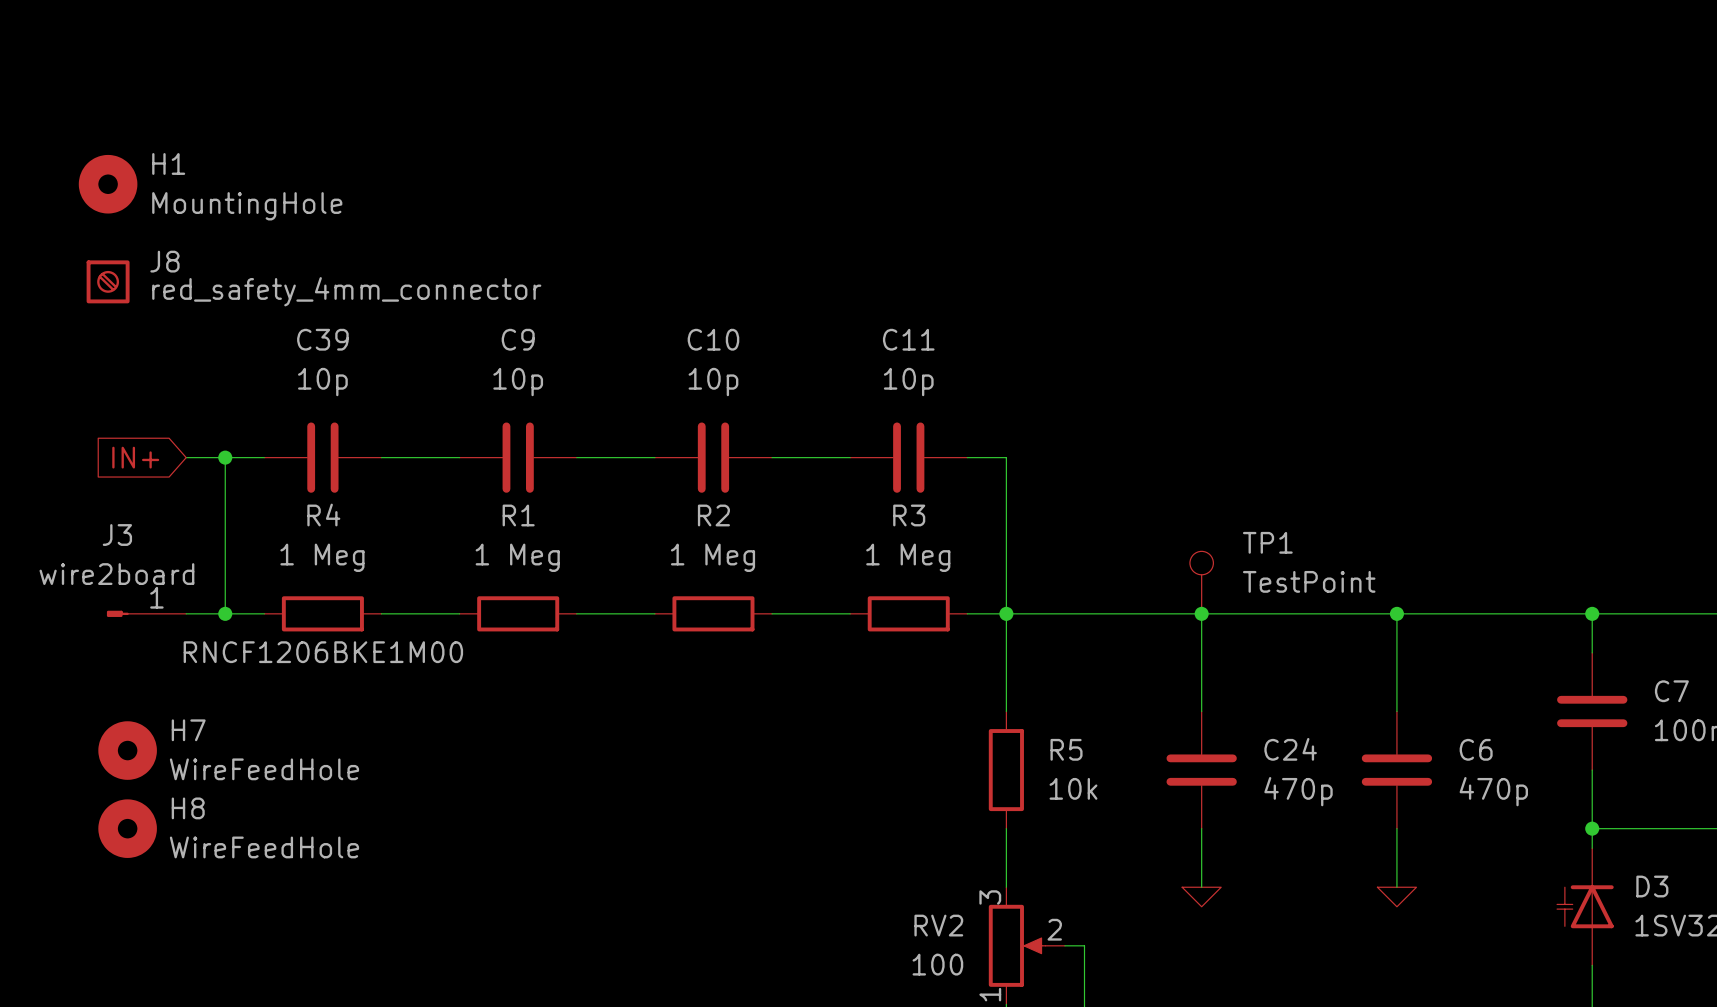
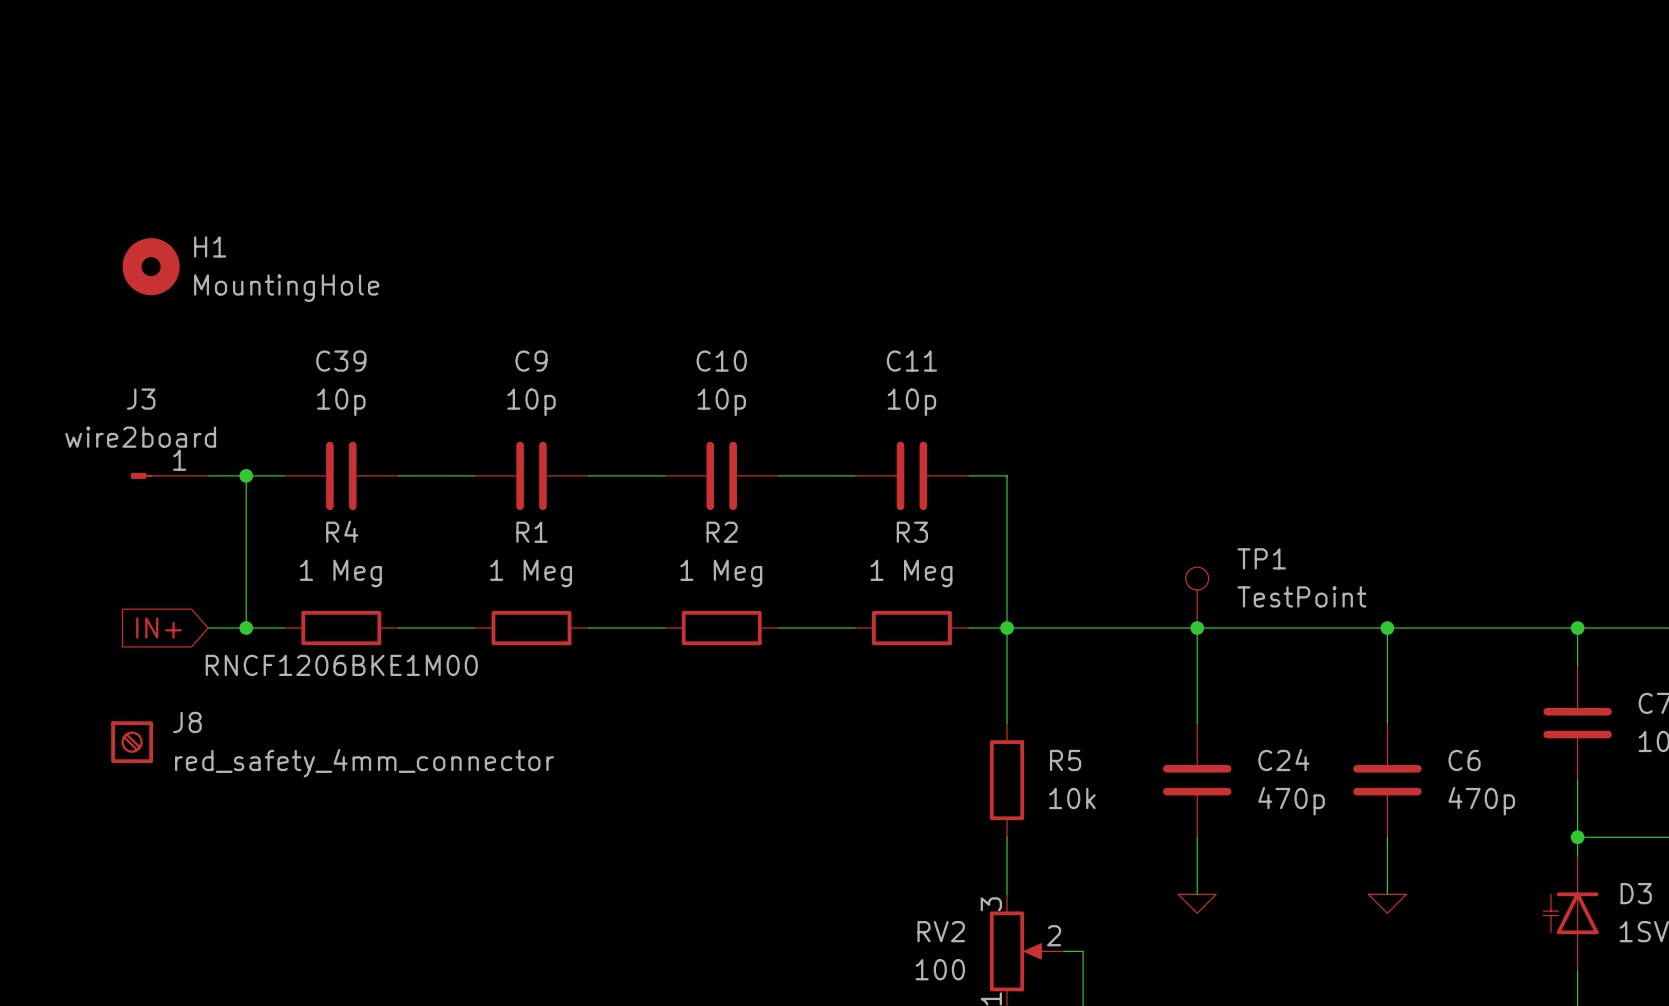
H1 position: (108, 184) -> (151, 266)
J8 position: (108, 281) -> (132, 742)
J8 value position: red_safety_4mm_connector (346, 291) -> red_safety_4mm_connector (364, 763)
global label position: IN+ (135, 457) -> IN+ (159, 628)
J3 position: (146, 613) -> (169, 475)
H7: WireFeedHole (127, 750) -> none
H8: WireFeedHole (127, 828) -> none

